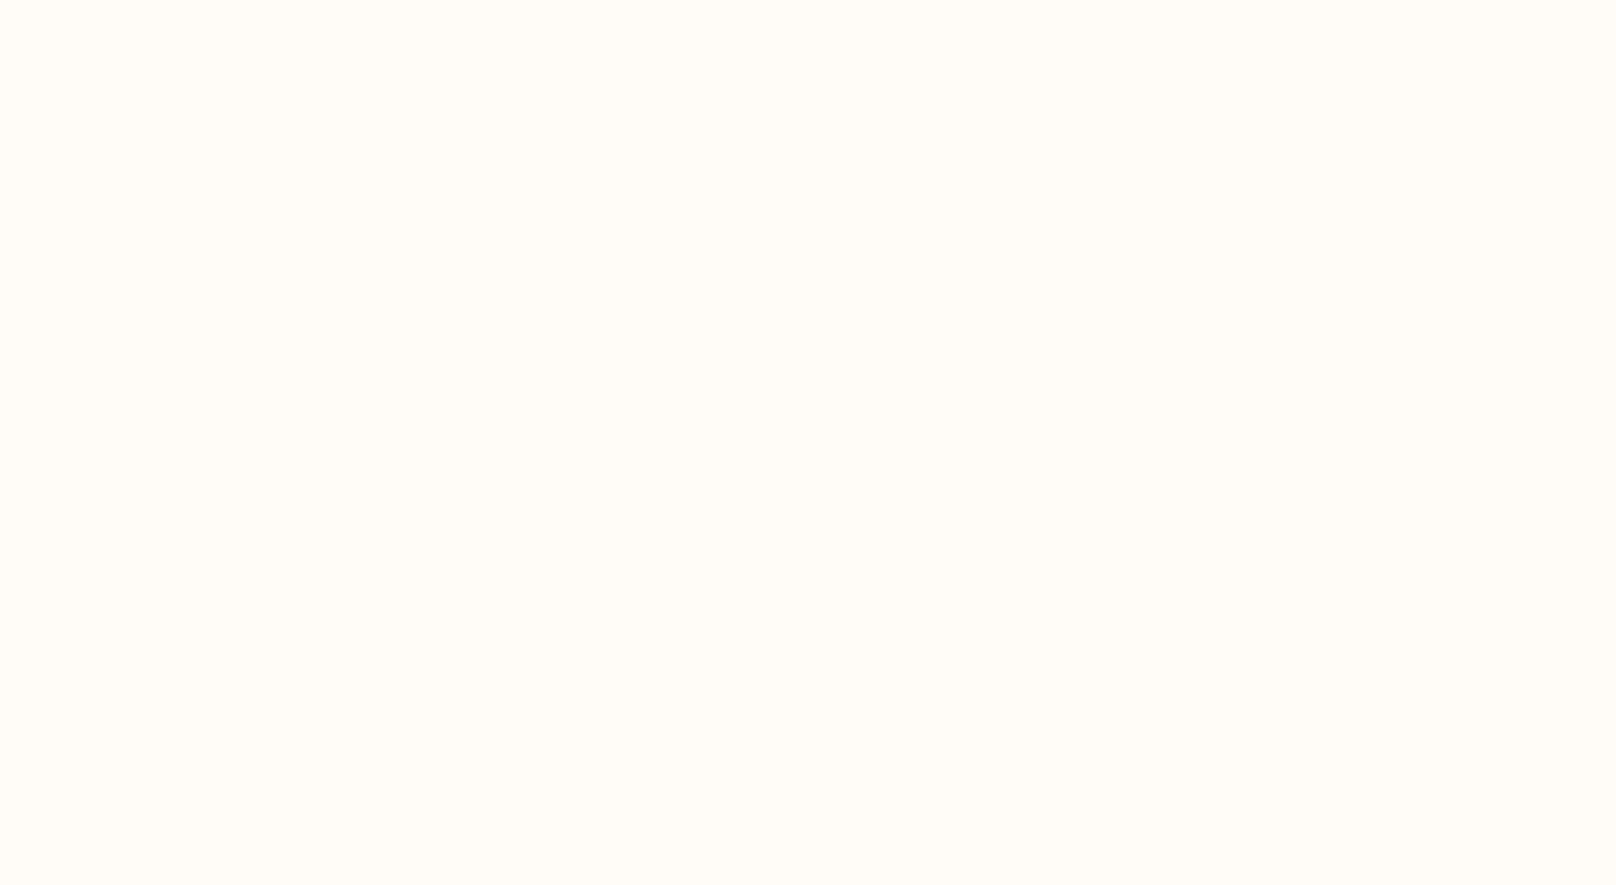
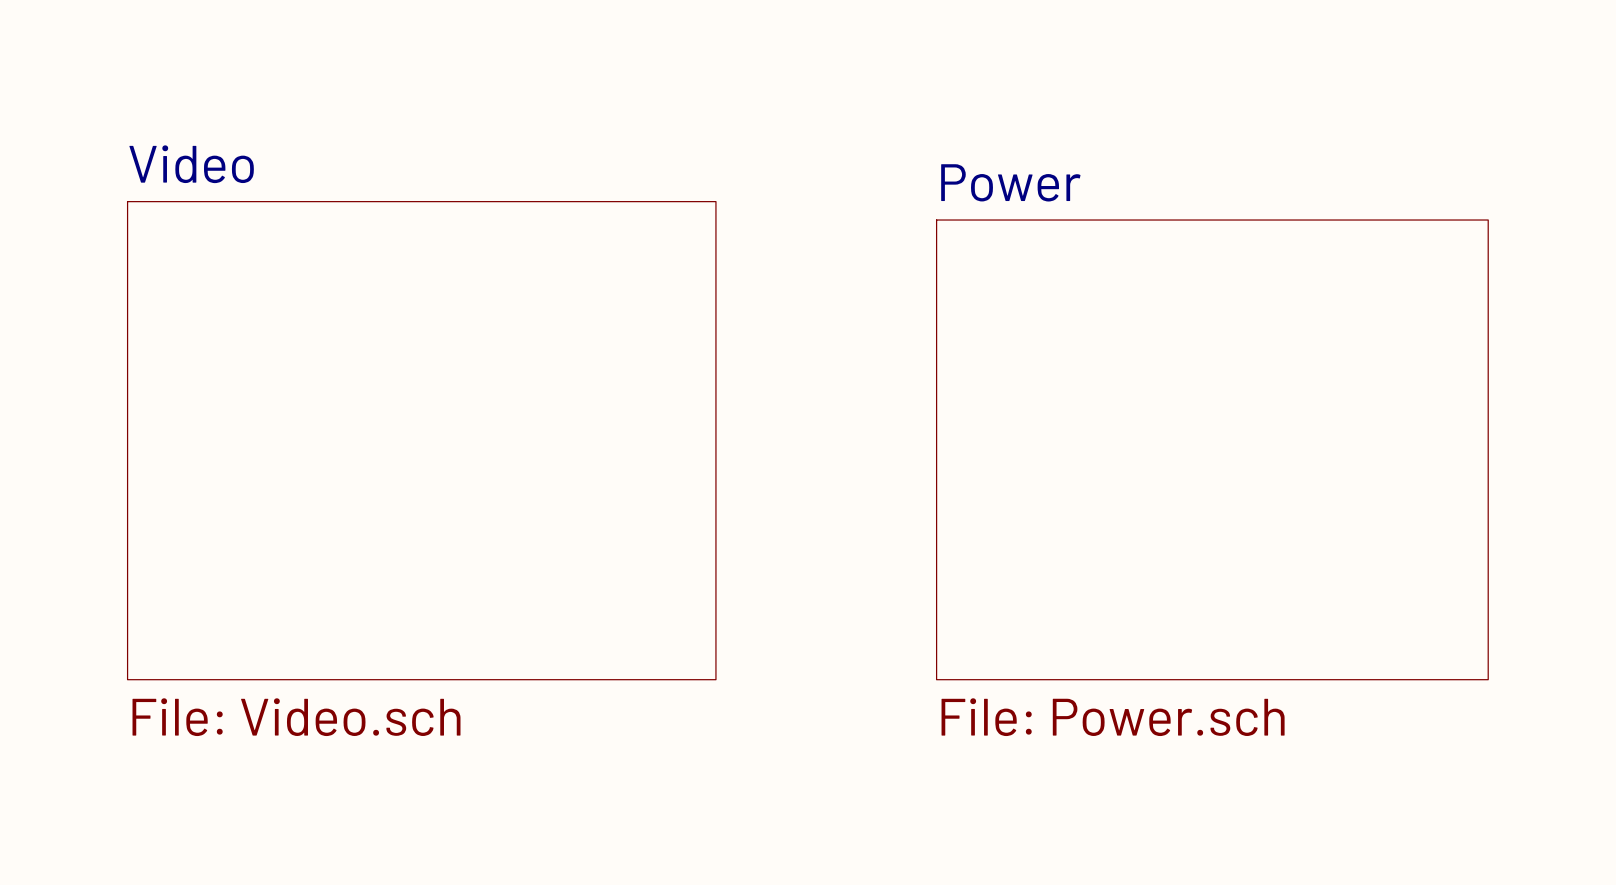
sheet Video: none -> File: Video.sch (421, 440)
sheet Power: none -> File: Power.sch (1212, 449)

